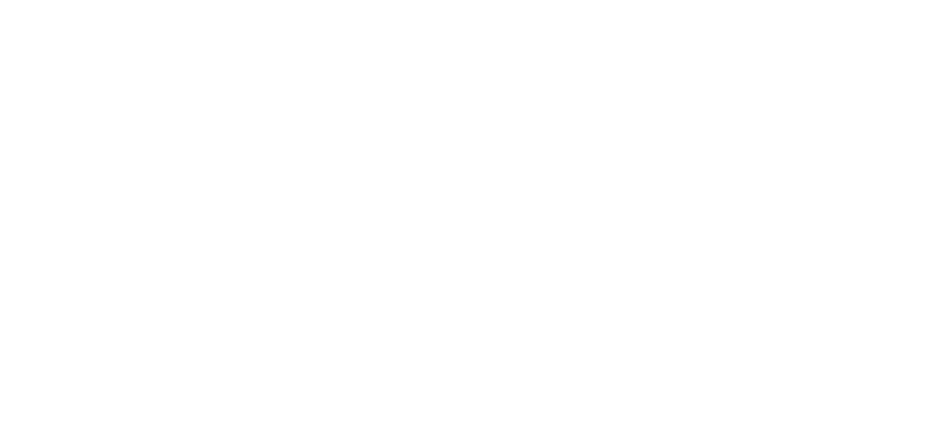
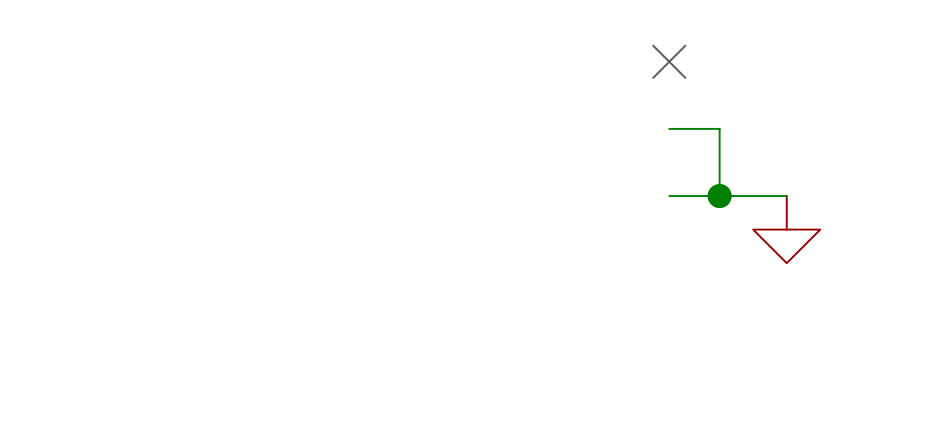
no-connect mark: none -> (669, 61)
wire: none -> (669, 128) (719, 128) (719, 196)
wire: none -> (669, 196) (786, 196)
junction: none -> (719, 196)
power symbol: none -> (786, 229)

